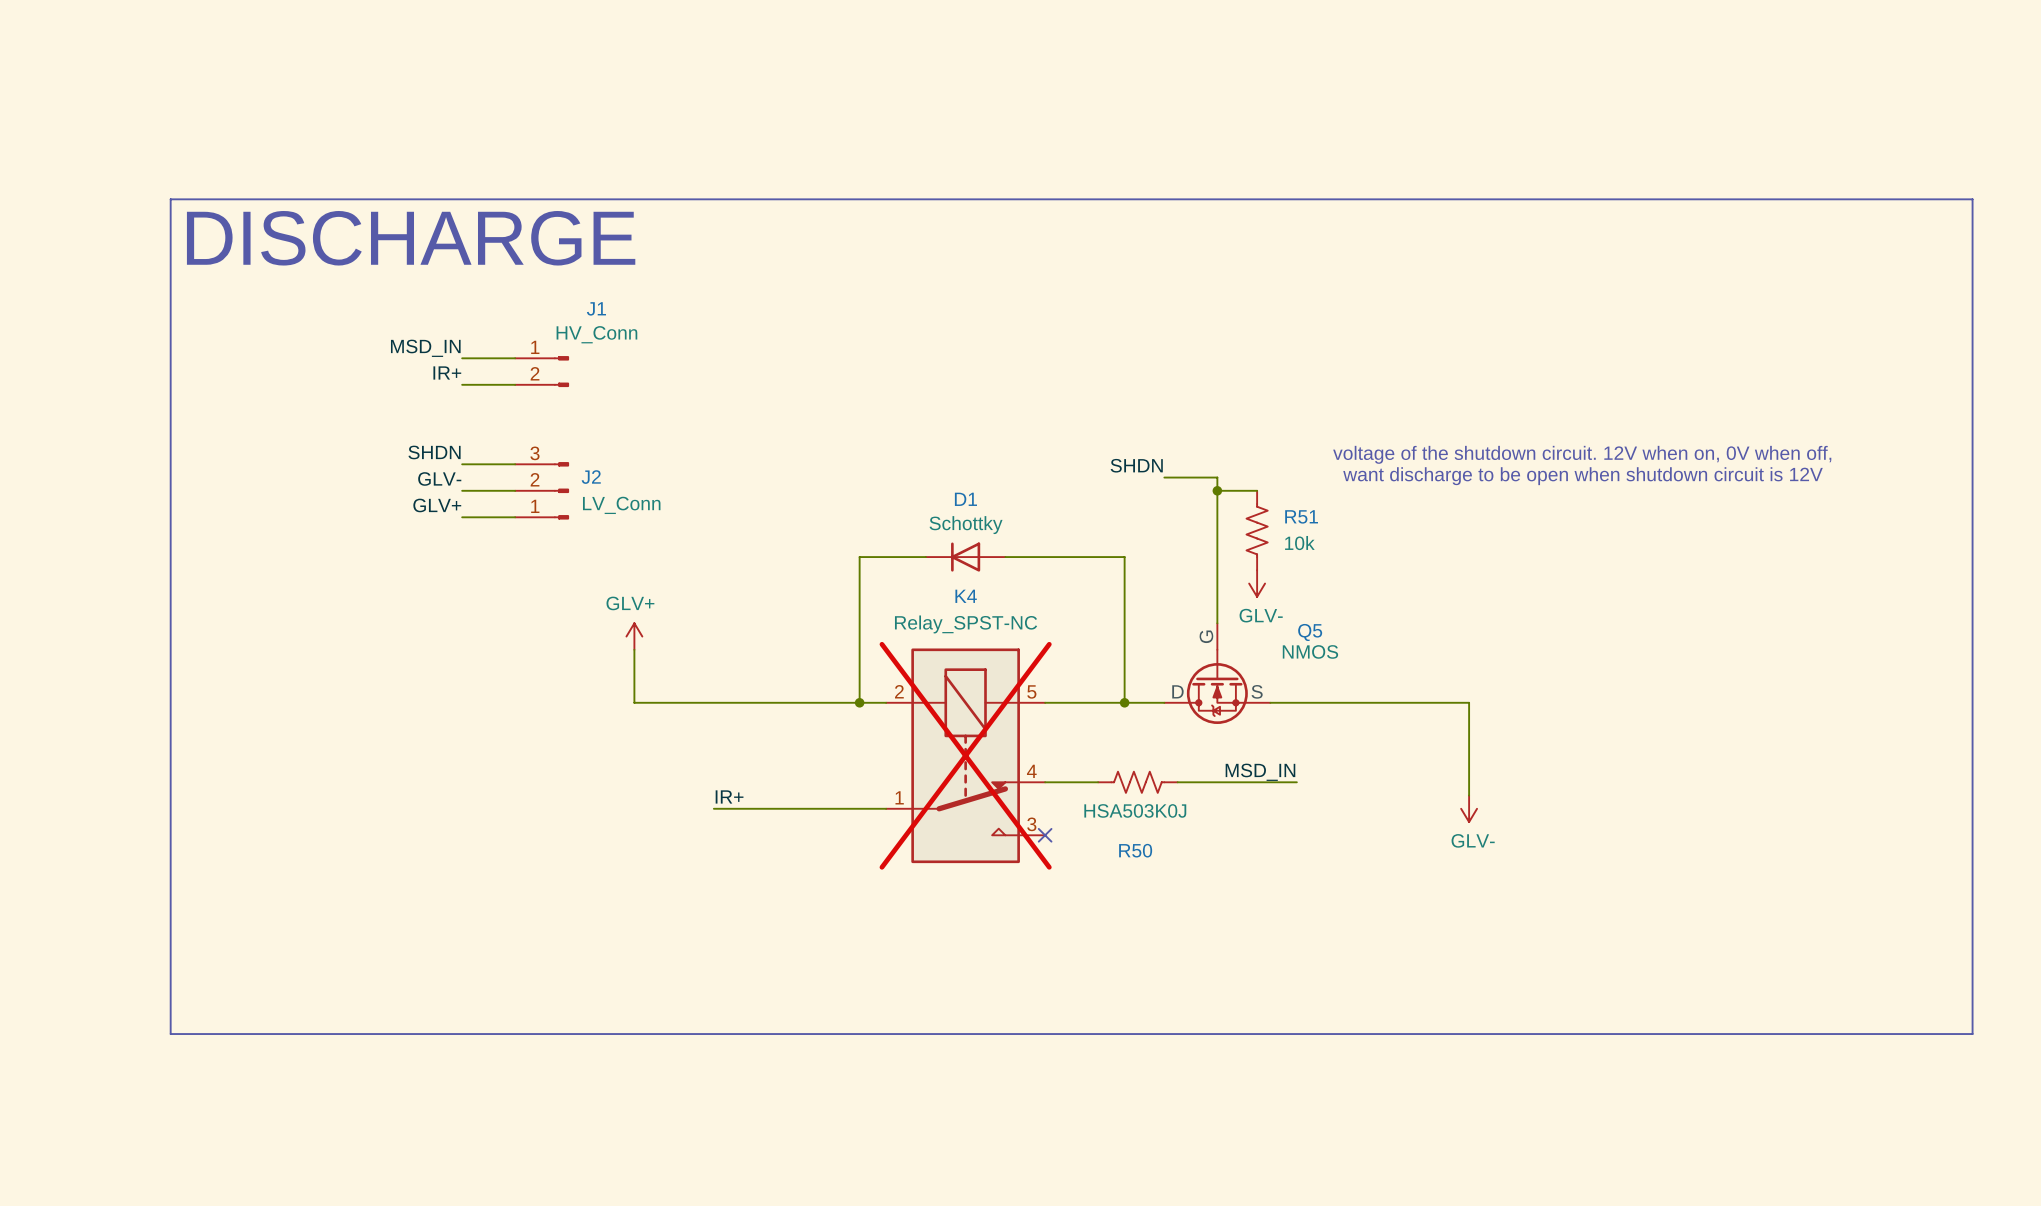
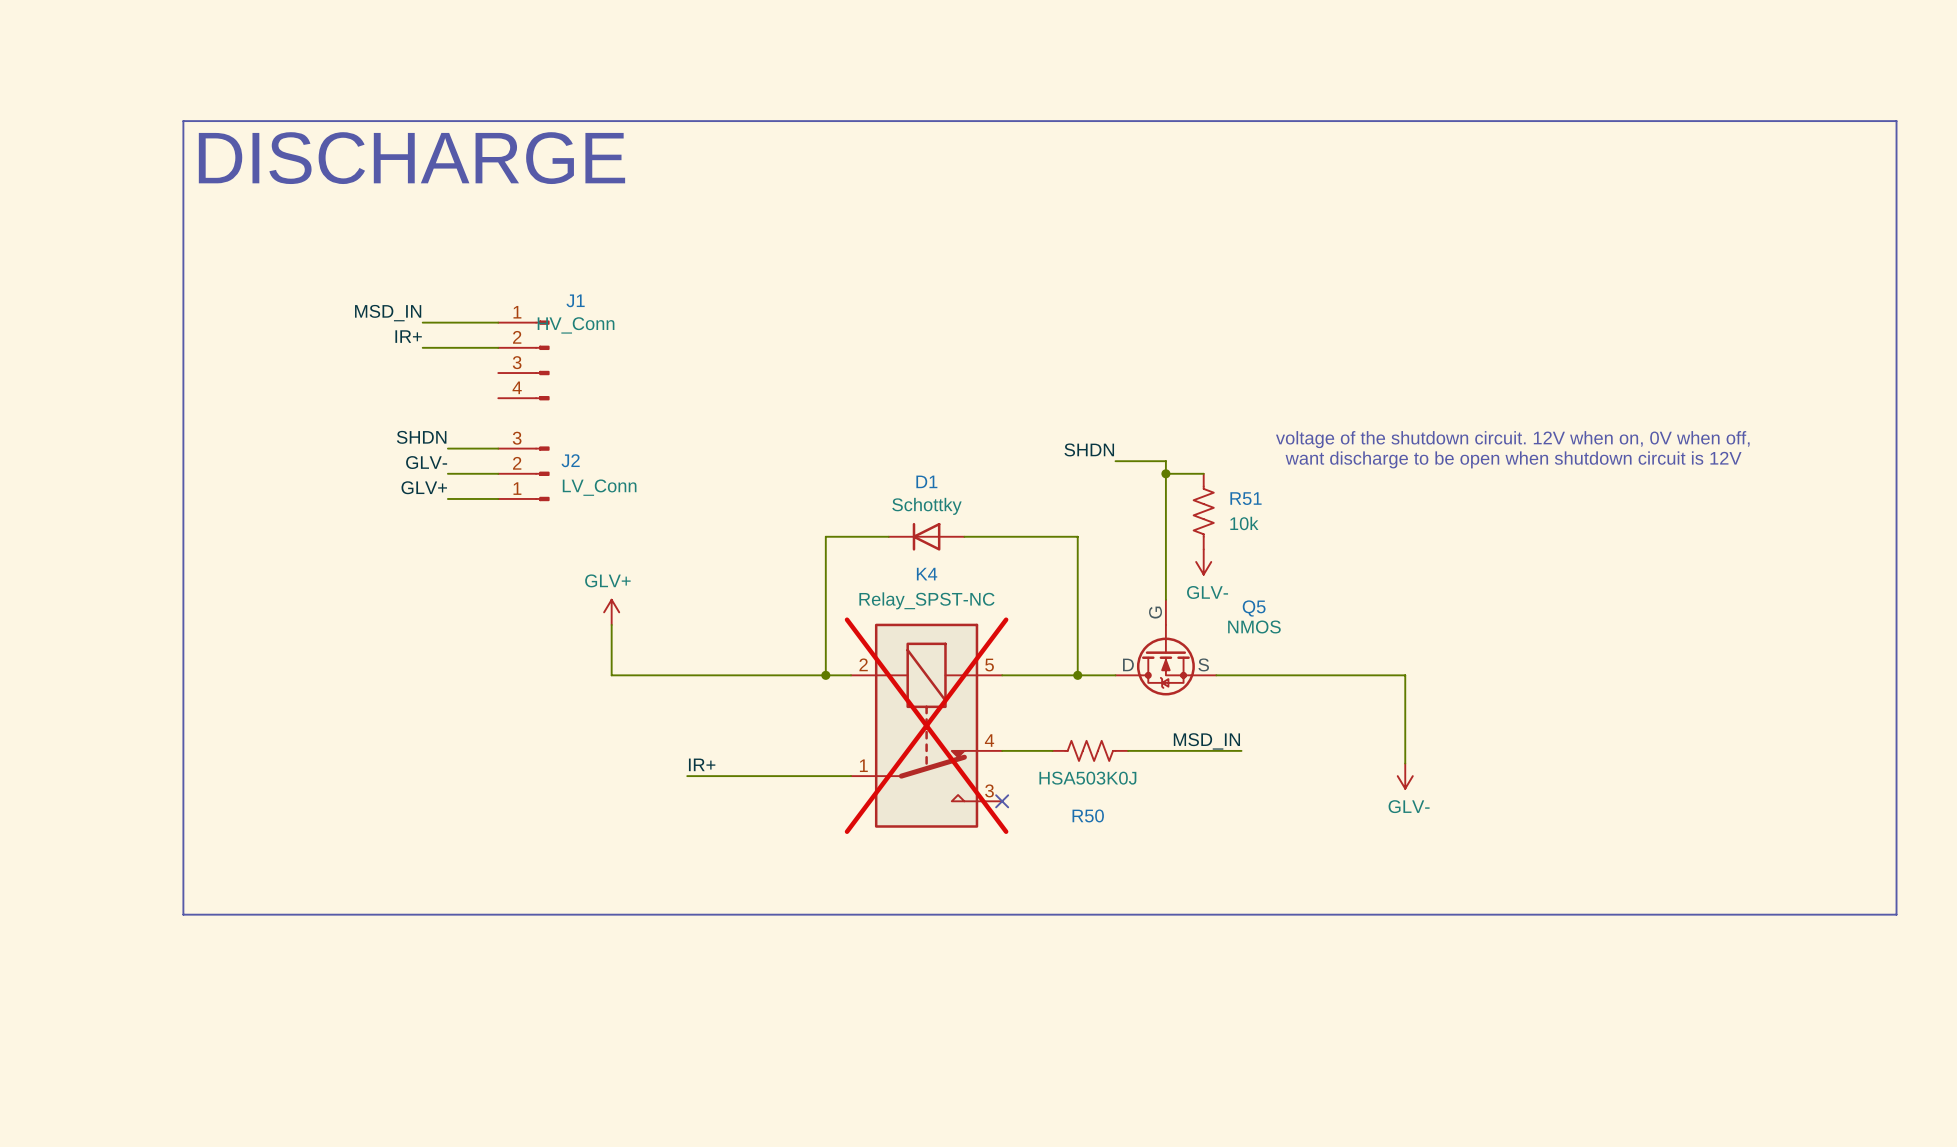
line: (170, 199) (1972, 199) (1972, 1034) (170, 1034) (170, 199) -> (183, 121) (183, 914) (1896, 914) (1896, 121) (183, 121)
text position: DISCHARGE (411, 238) -> DISCHARGE (411, 158)
wire: none -> (422, 322) (498, 322)
label position: MSD_IN (425, 348) -> MSD_IN (388, 313)
J1 symbol: [515, 356, 569, 387] -> [498, 320, 550, 401]
wire: none -> (422, 347) (447, 347)
label position: IR+ (447, 372) -> IR+ (408, 336)
wire: (462, 384) (515, 384) -> none

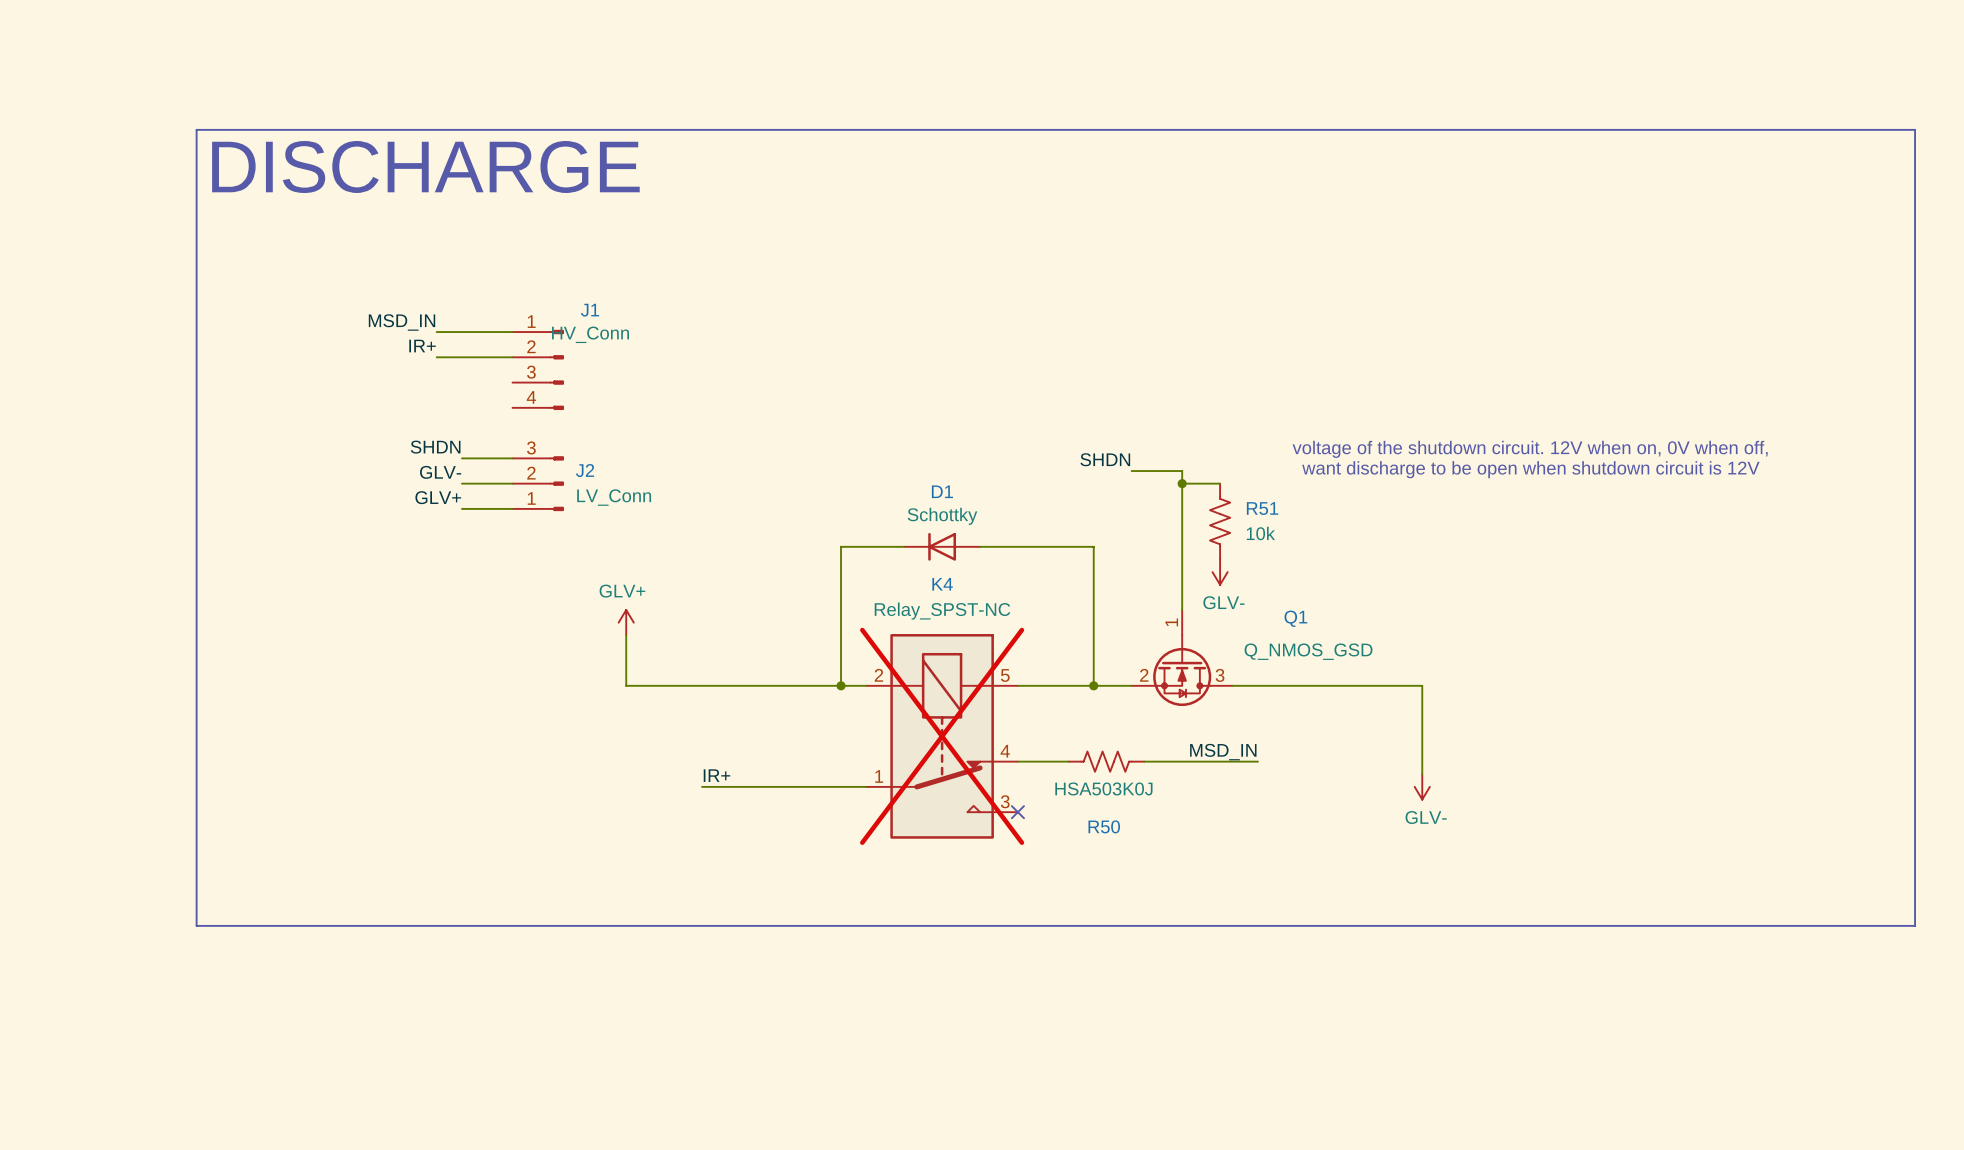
Q5: NMOS (1165, 647) -> none
Q1: none -> Q_NMOS_GSD (1182, 658)

